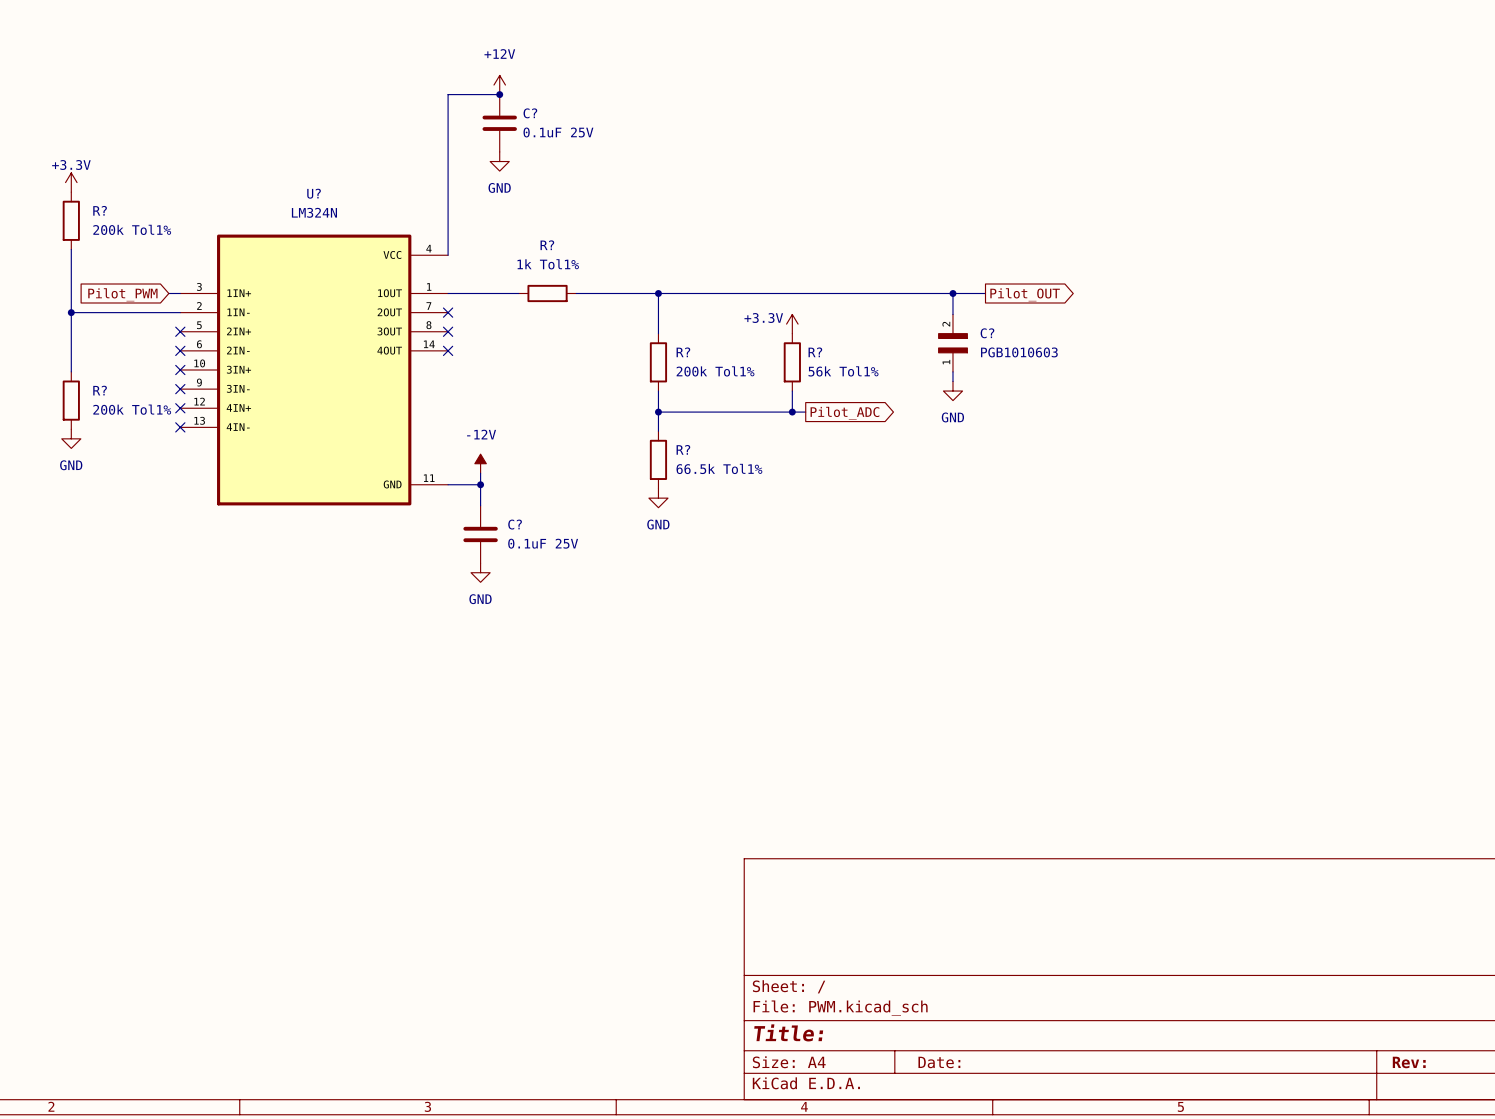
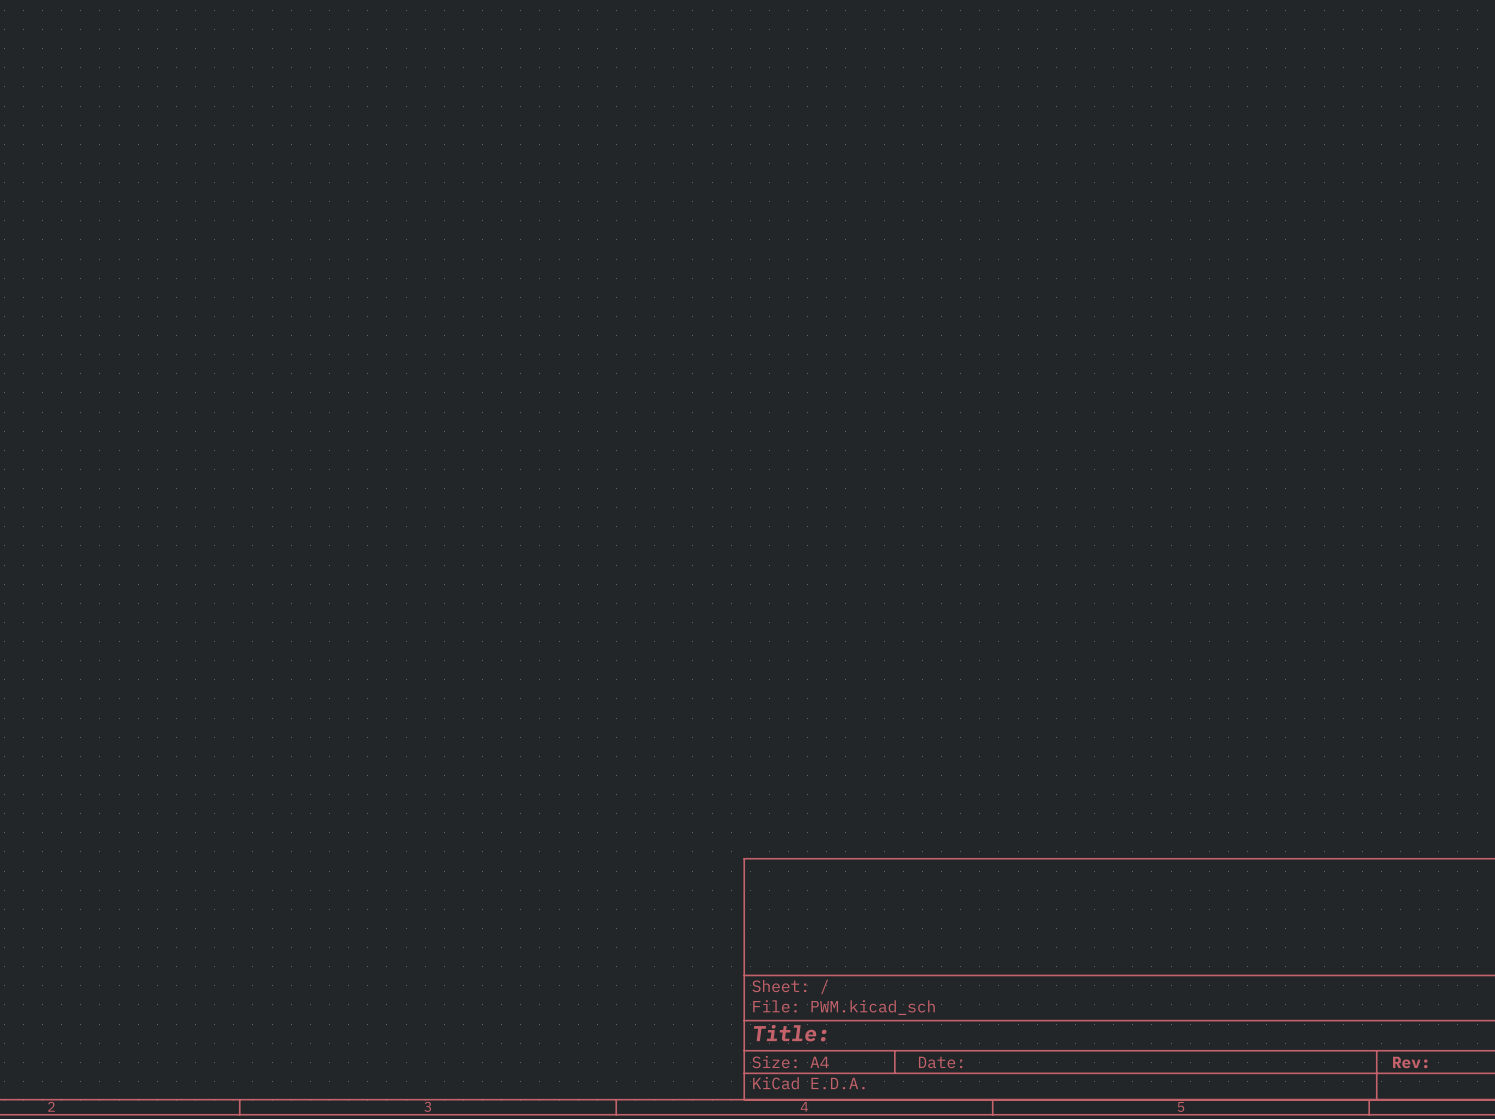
power symbol: +12V (499, 85) -> none
wire: (499, 94) (448, 94) (448, 255) -> none
junction: (499, 94) -> none
C?: 0.1uF 25V (499, 123) -> none
power symbol: GND (499, 161) -> none
power symbol: +3.3V (71, 182) -> none
R?: 200k Tol1% (71, 220) -> none
wire: (71, 249) (71, 371) -> none
wire: (168, 293) (180, 293) -> none
wire: (448, 293) (518, 293) -> none
R?: 1k Tol1% (547, 293) -> none
wire: (576, 293) (985, 293) -> none
wire: (658, 293) (658, 333) -> none
junction: (658, 293) -> none
wire: (952, 293) (952, 314) -> none
junction: (952, 293) -> none
global label: Pilot_PWM (122, 294) -> none
global label: Pilot_OUT (1025, 294) -> none
wire: (71, 312) (180, 312) -> none
junction: (71, 312) -> none
no-connect mark: (448, 312) -> none
power symbol: +3.3V (792, 324) -> none
no-connect mark: (180, 331) -> none
no-connect mark: (448, 331) -> none
C?: PGB1010603 (953, 343) -> none
no-connect mark: (180, 350) -> none
no-connect mark: (448, 350) -> none
R?: 200k Tol1% (658, 362) -> none
R?: 56k Tol1% (792, 362) -> none
no-connect mark: (180, 370) -> none
U?: LM324N (314, 370) -> none
wire: (952, 371) (952, 381) -> none
no-connect mark: (180, 389) -> none
wire: (658, 391) (658, 431) -> none
wire: (792, 391) (792, 412) -> none
power symbol: GND (952, 391) -> none
R?: 200k Tol1% (71, 400) -> none
no-connect mark: (180, 408) -> none
wire: (658, 412) (805, 412) -> none
junction: (658, 412) -> none
junction: (792, 412) -> none
global label: Pilot_ADC (844, 413) -> none
no-connect mark: (180, 427) -> none
power symbol: GND (71, 438) -> none
R?: 66.5k Tol1% (658, 459) -> none
power symbol: -12V (480, 463) -> none
wire: (480, 473) (480, 505) -> none
wire: (448, 484) (480, 484) -> none
junction: (480, 484) -> none
power symbol: GND (658, 498) -> none
C?: 0.1uF 25V (480, 534) -> none
power symbol: GND (480, 572) -> none

